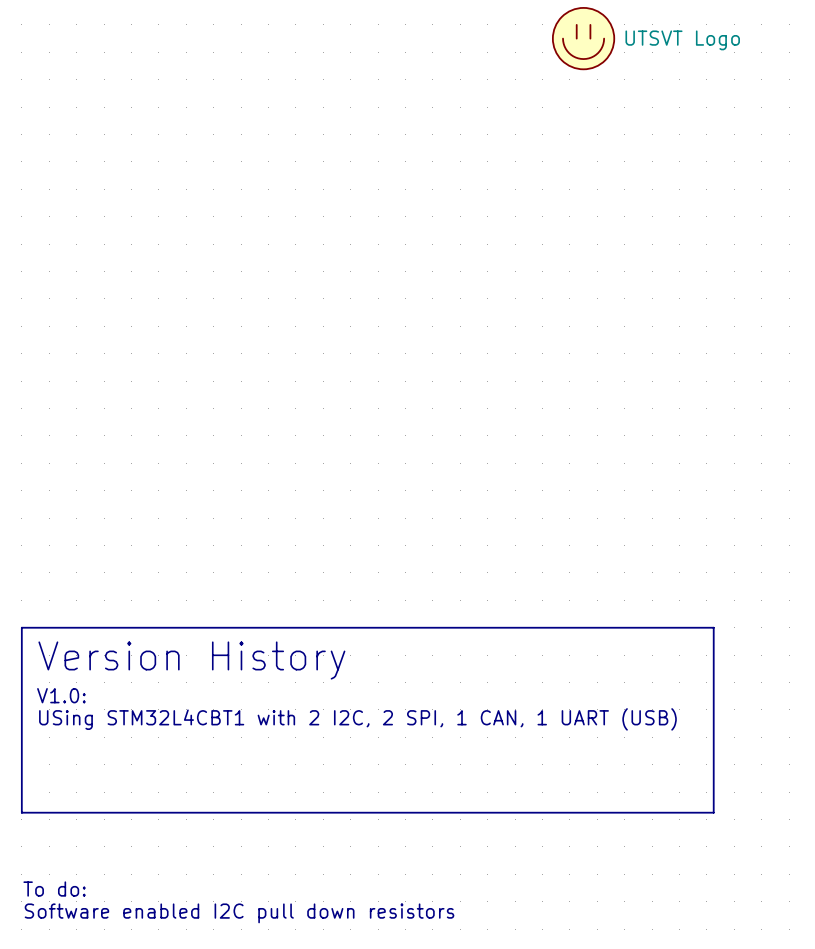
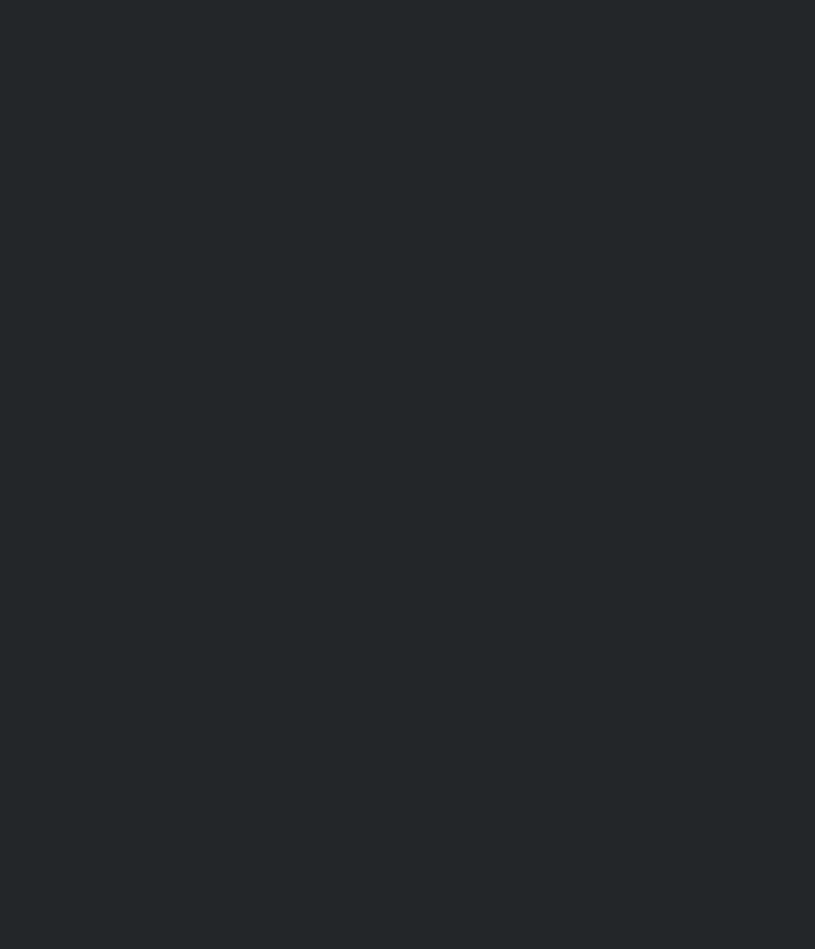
part: UTSVT Logo (583, 38) -> none
line: (21, 627) (713, 627) (713, 812) (21, 812) (21, 627) -> none
text: Version History (191, 660) -> none
text: V1.0: (61, 695) -> none
text: USing STM32L4CBT1 with 2 I2C, 2 SPI, 1 CAN, 1 UART (USB) (357, 719) -> none
text: To do: (54, 889) -> none
text: Software enabled I2C pull down resistors (239, 913) -> none

